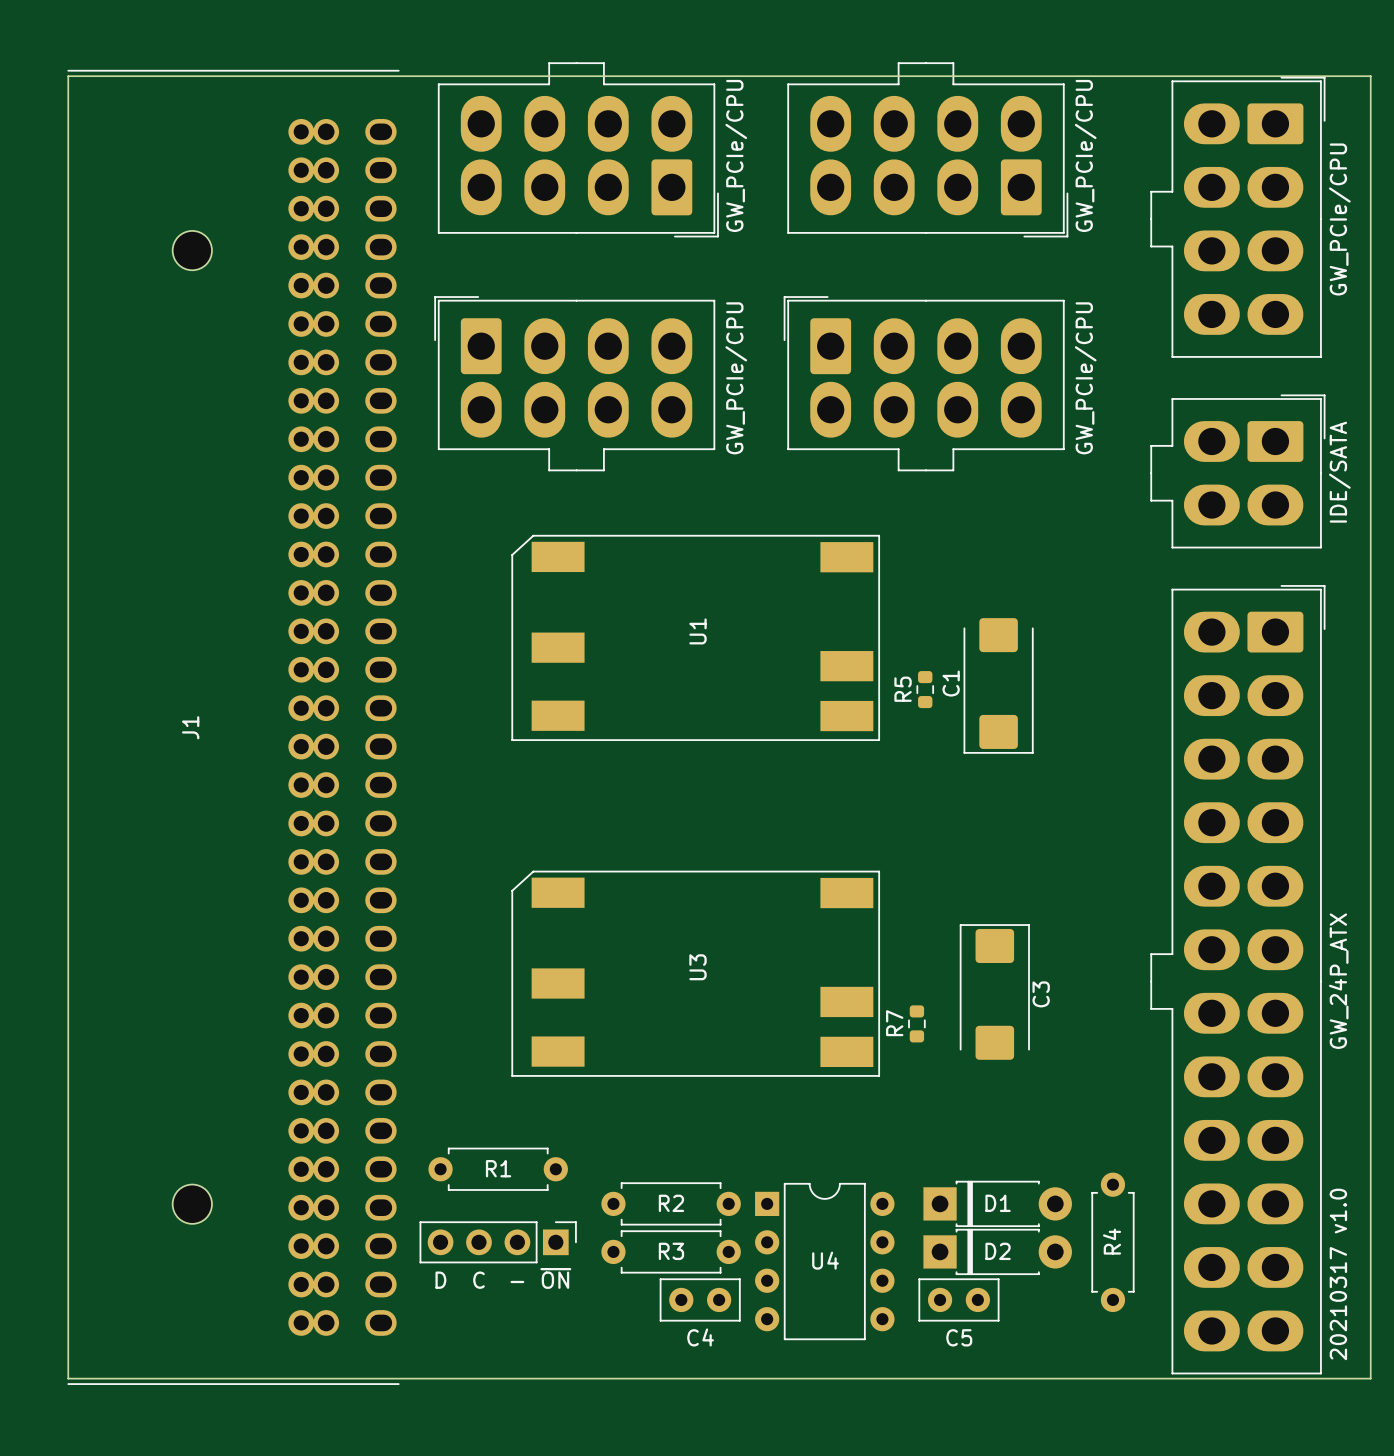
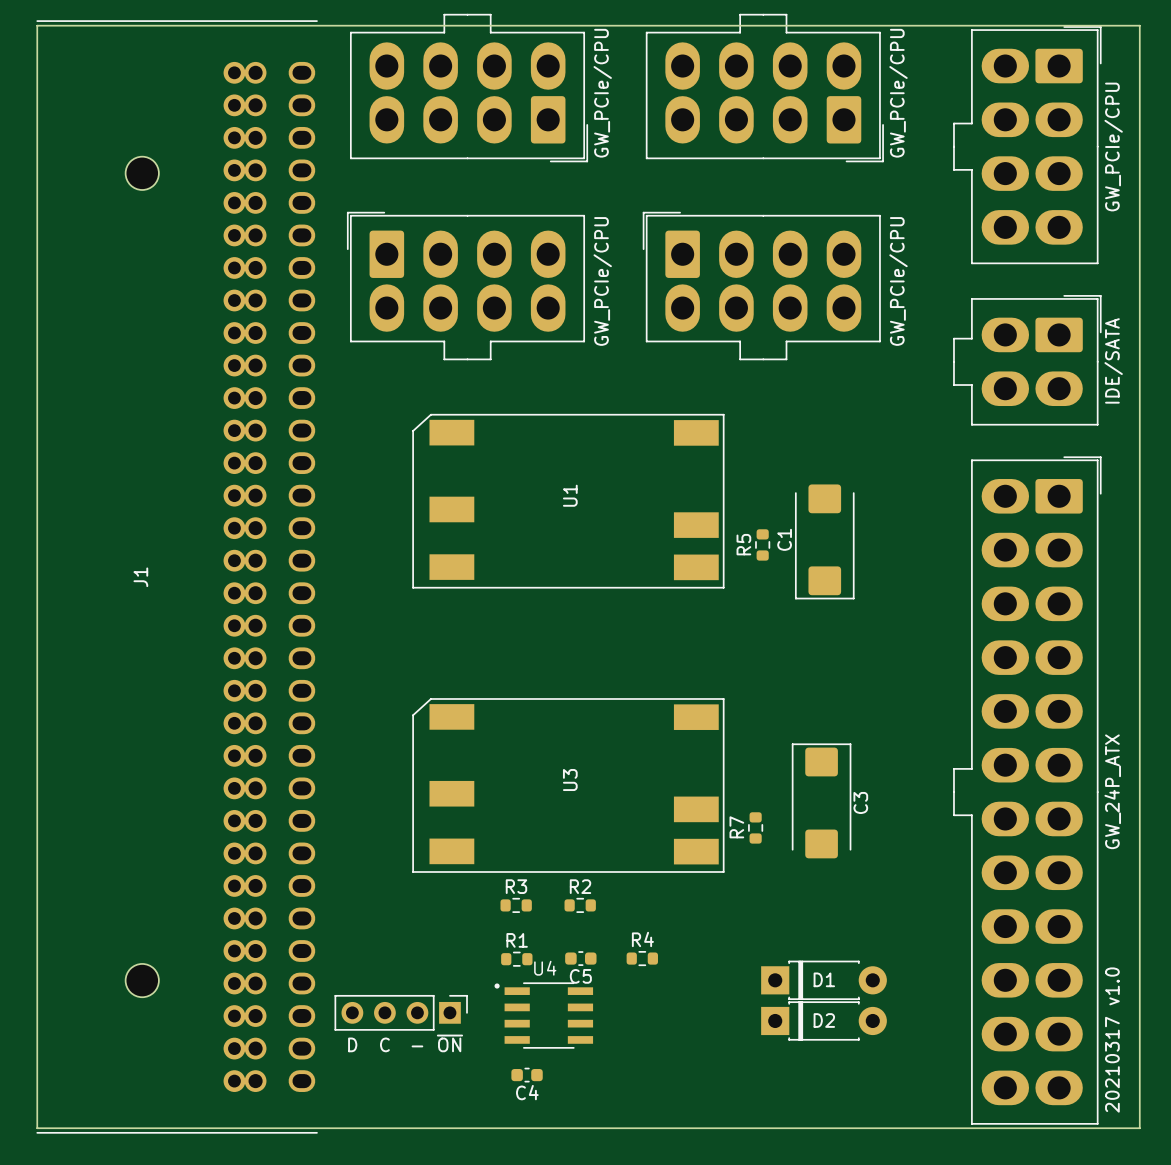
R1 footprint: [428, 1147, 568, 1191] -> [501, 951, 533, 967]
R4 footprint: [1091, 1172, 1135, 1313] -> [626, 951, 658, 967]
R2 footprint: [601, 1182, 741, 1226] -> [564, 897, 596, 913]
U4 footprint: [755, 1182, 895, 1341] -> [494, 982, 594, 1049]
R3 footprint: [601, 1230, 741, 1274] -> [500, 897, 532, 913]
U4 name position: U4 (825, 1260) -> U4 (545, 968)
C4 footprint: [659, 1278, 741, 1322] -> [511, 1067, 543, 1083]
C5 footprint: [918, 1278, 1000, 1322] -> [565, 951, 597, 966]

